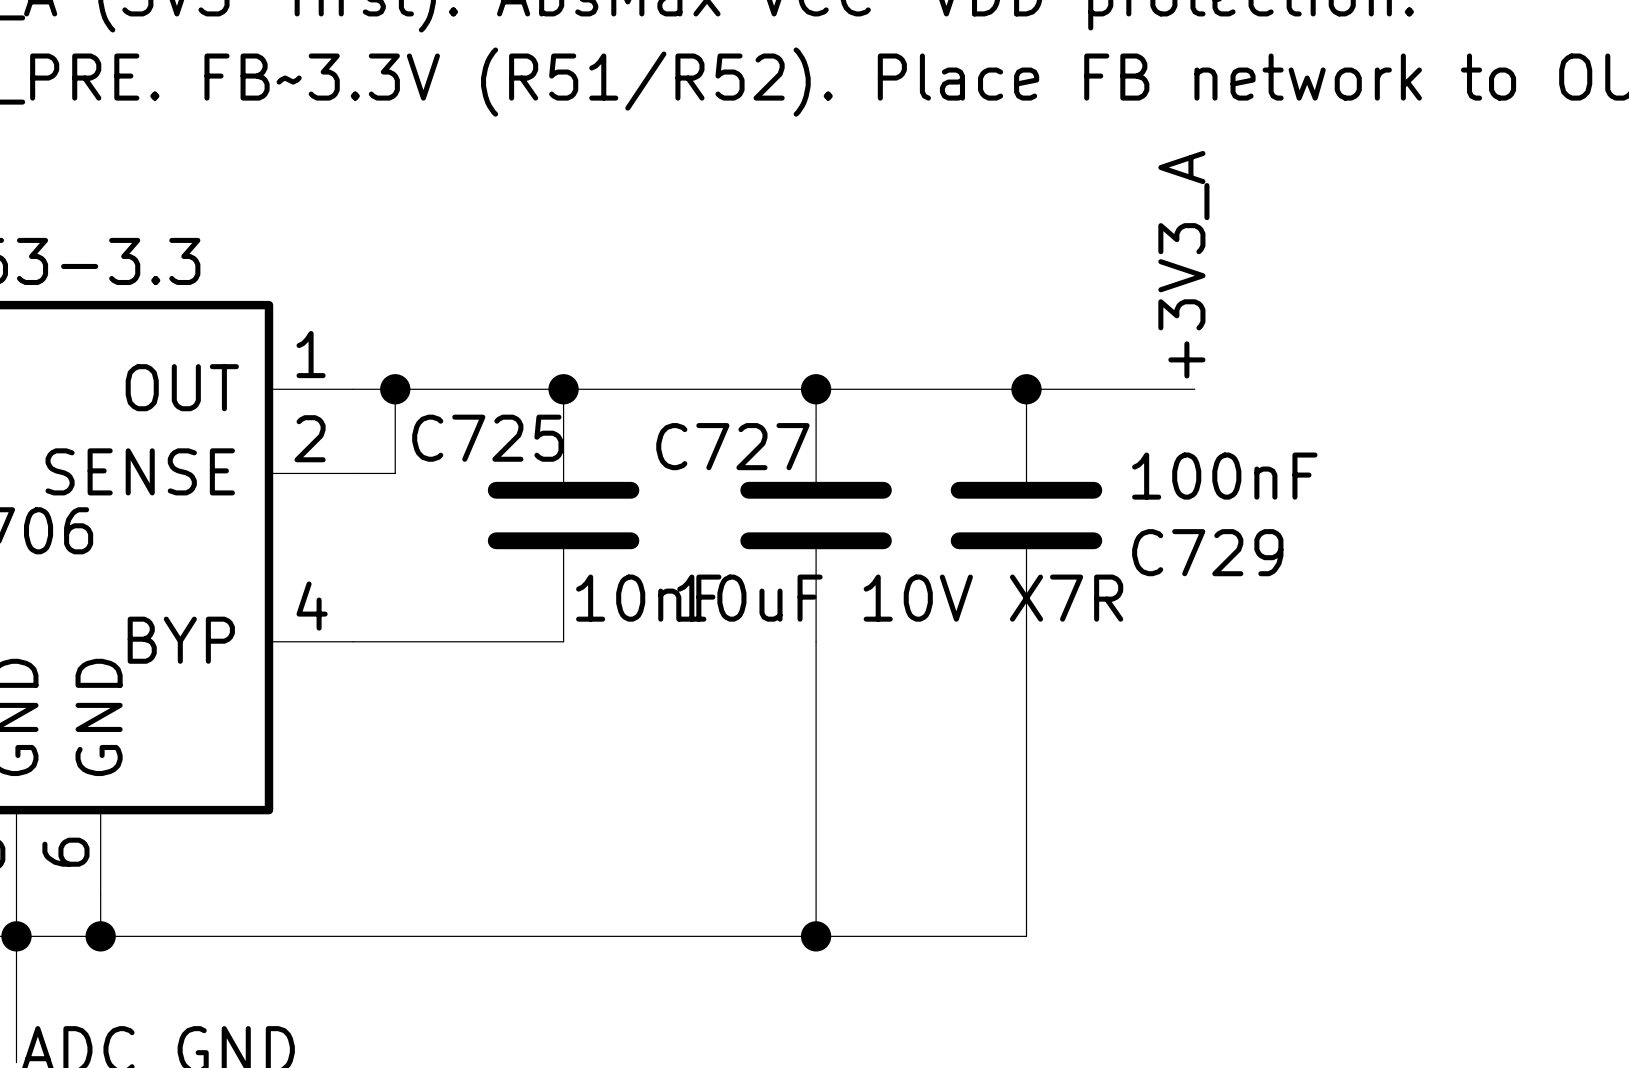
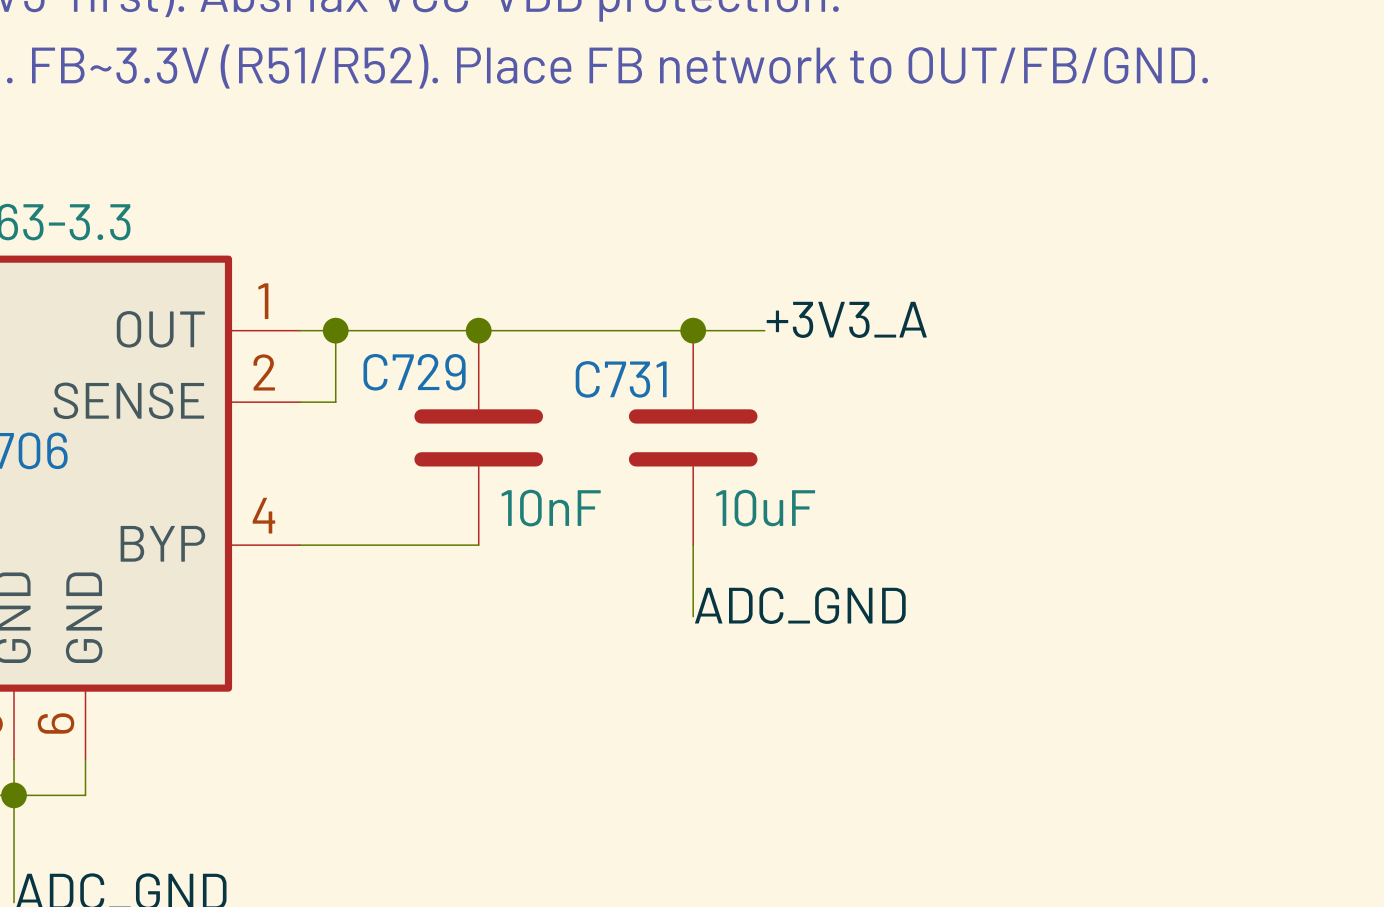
label rotation: 0° (1183, 264) -> 90° clockwise (846, 319)
wire: (900, 389) (1194, 389) -> none
junction: (1026, 389) -> none
C725 name: C725 (487, 438) -> C729 (414, 372)
C727 name: C727 (732, 446) -> C731 (621, 379)
C729: 100nF (1026, 515) -> none
C727 value: 10uF 10V X7R (900, 598) -> 10uF (765, 508)
wire: (1026, 641) (1026, 936) (100, 936) -> none
label: none -> ADC_GND (800, 605)
wire: (816, 725) (816, 936) -> none
junction: (100, 936) -> none
junction: (816, 936) -> none

